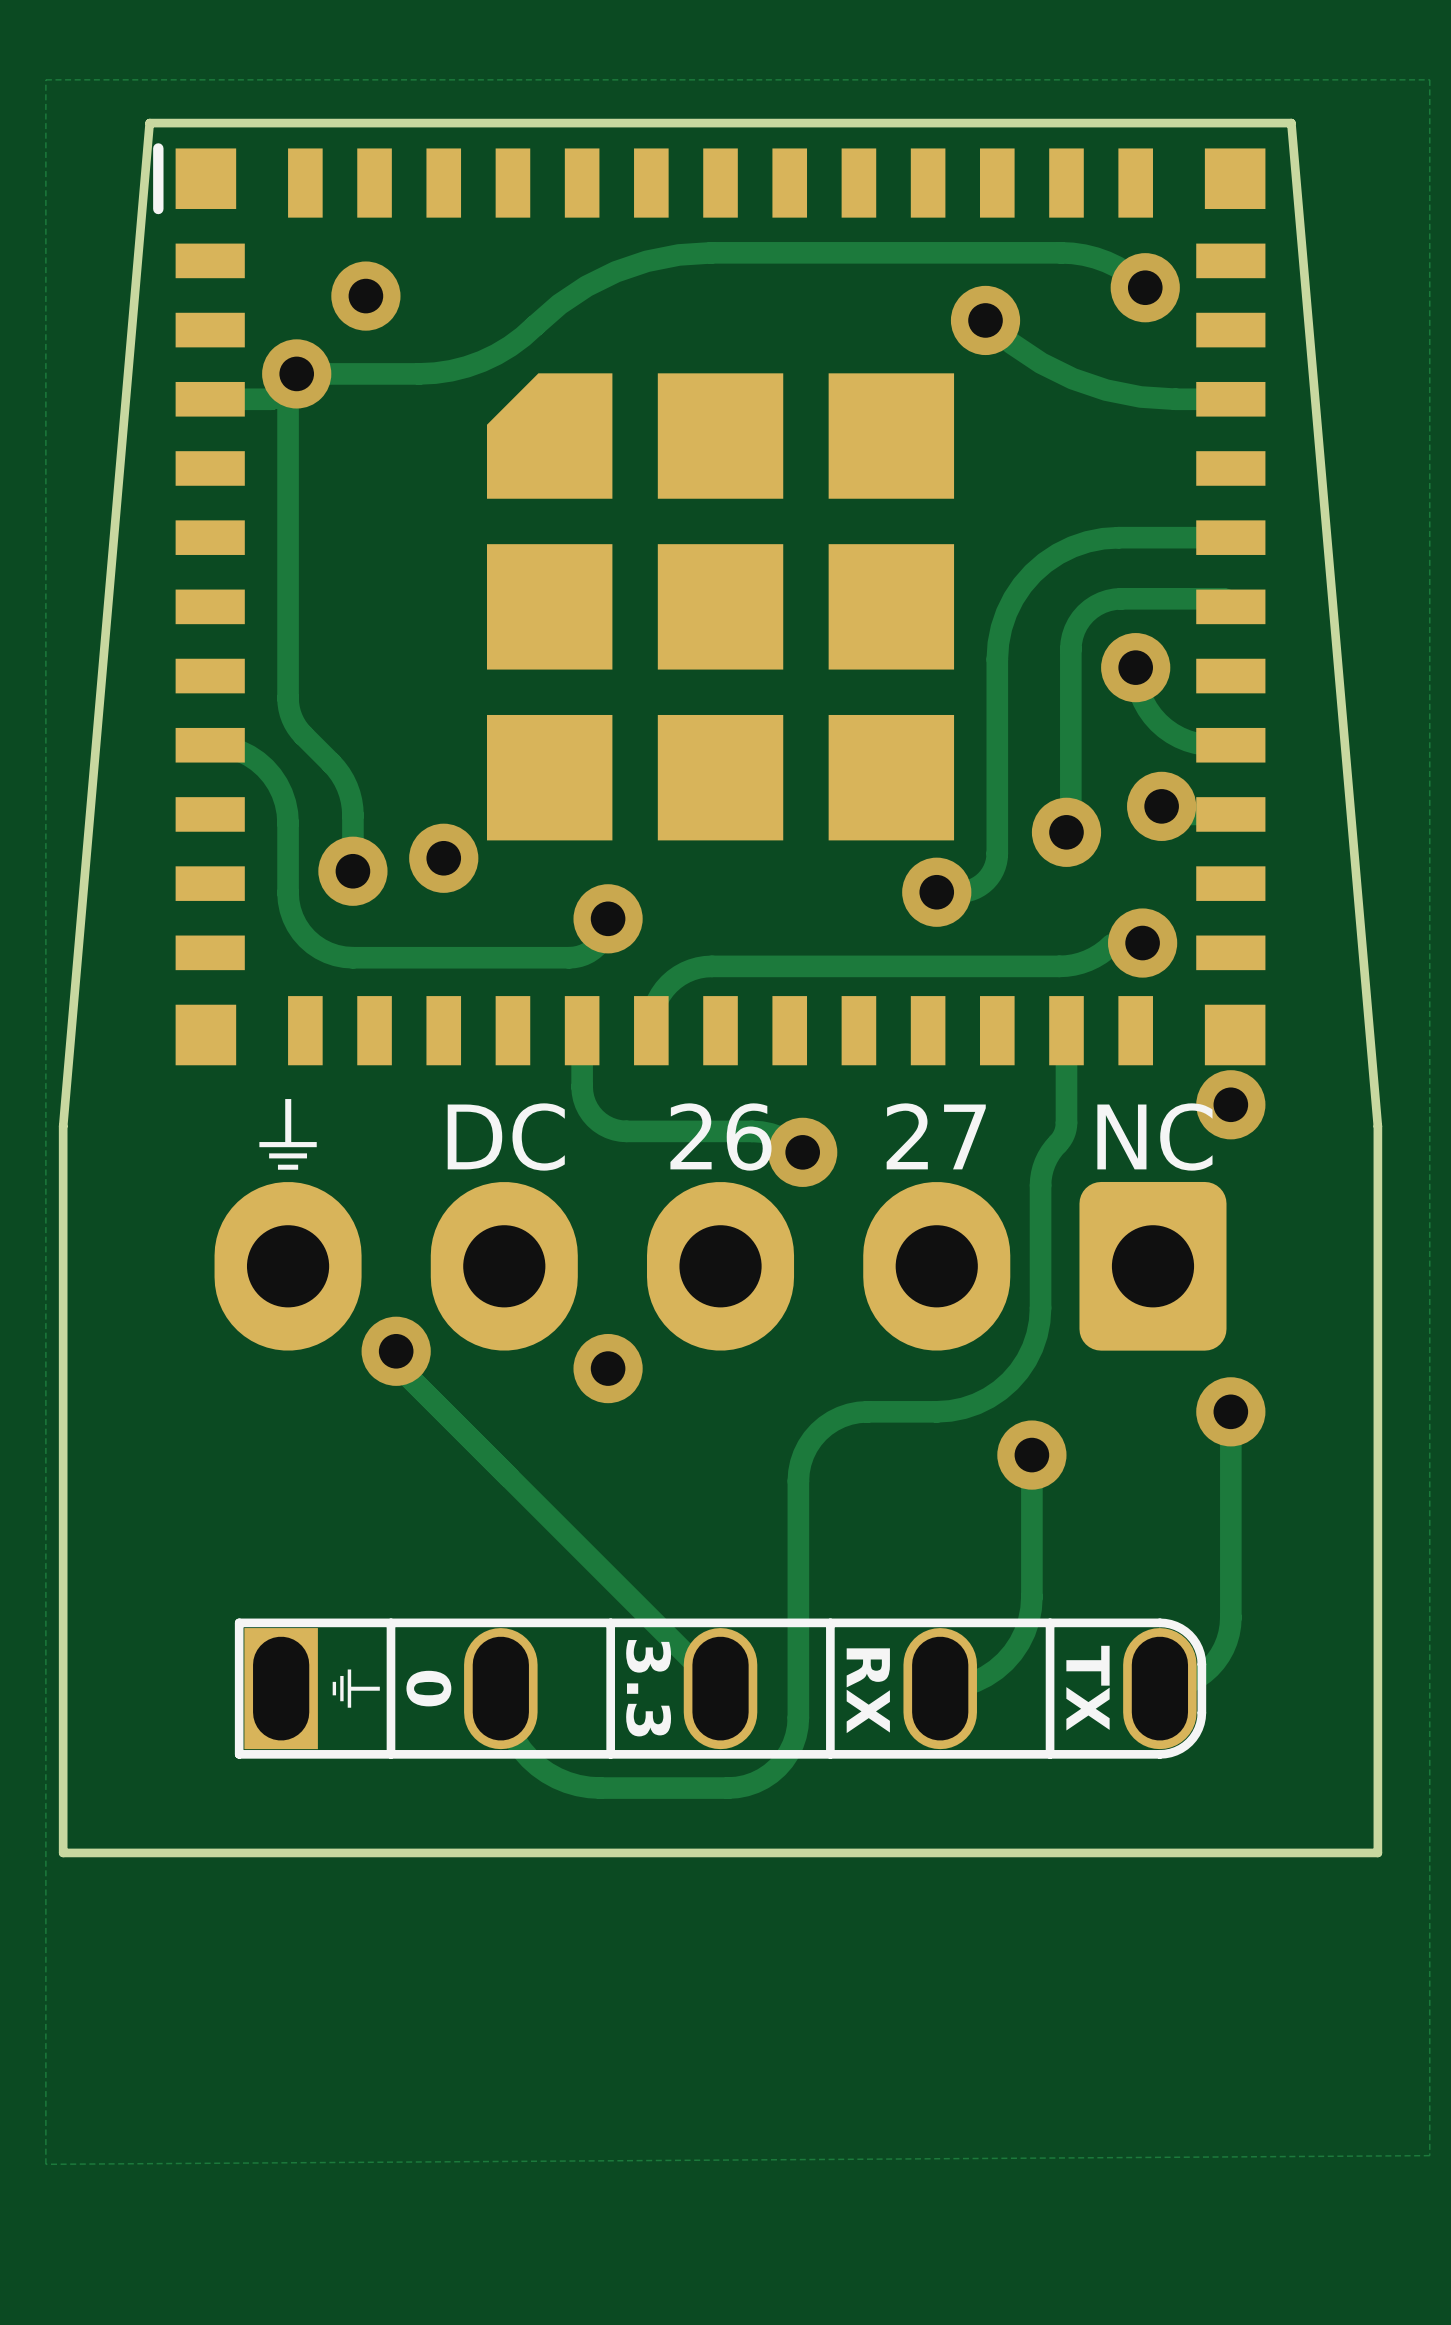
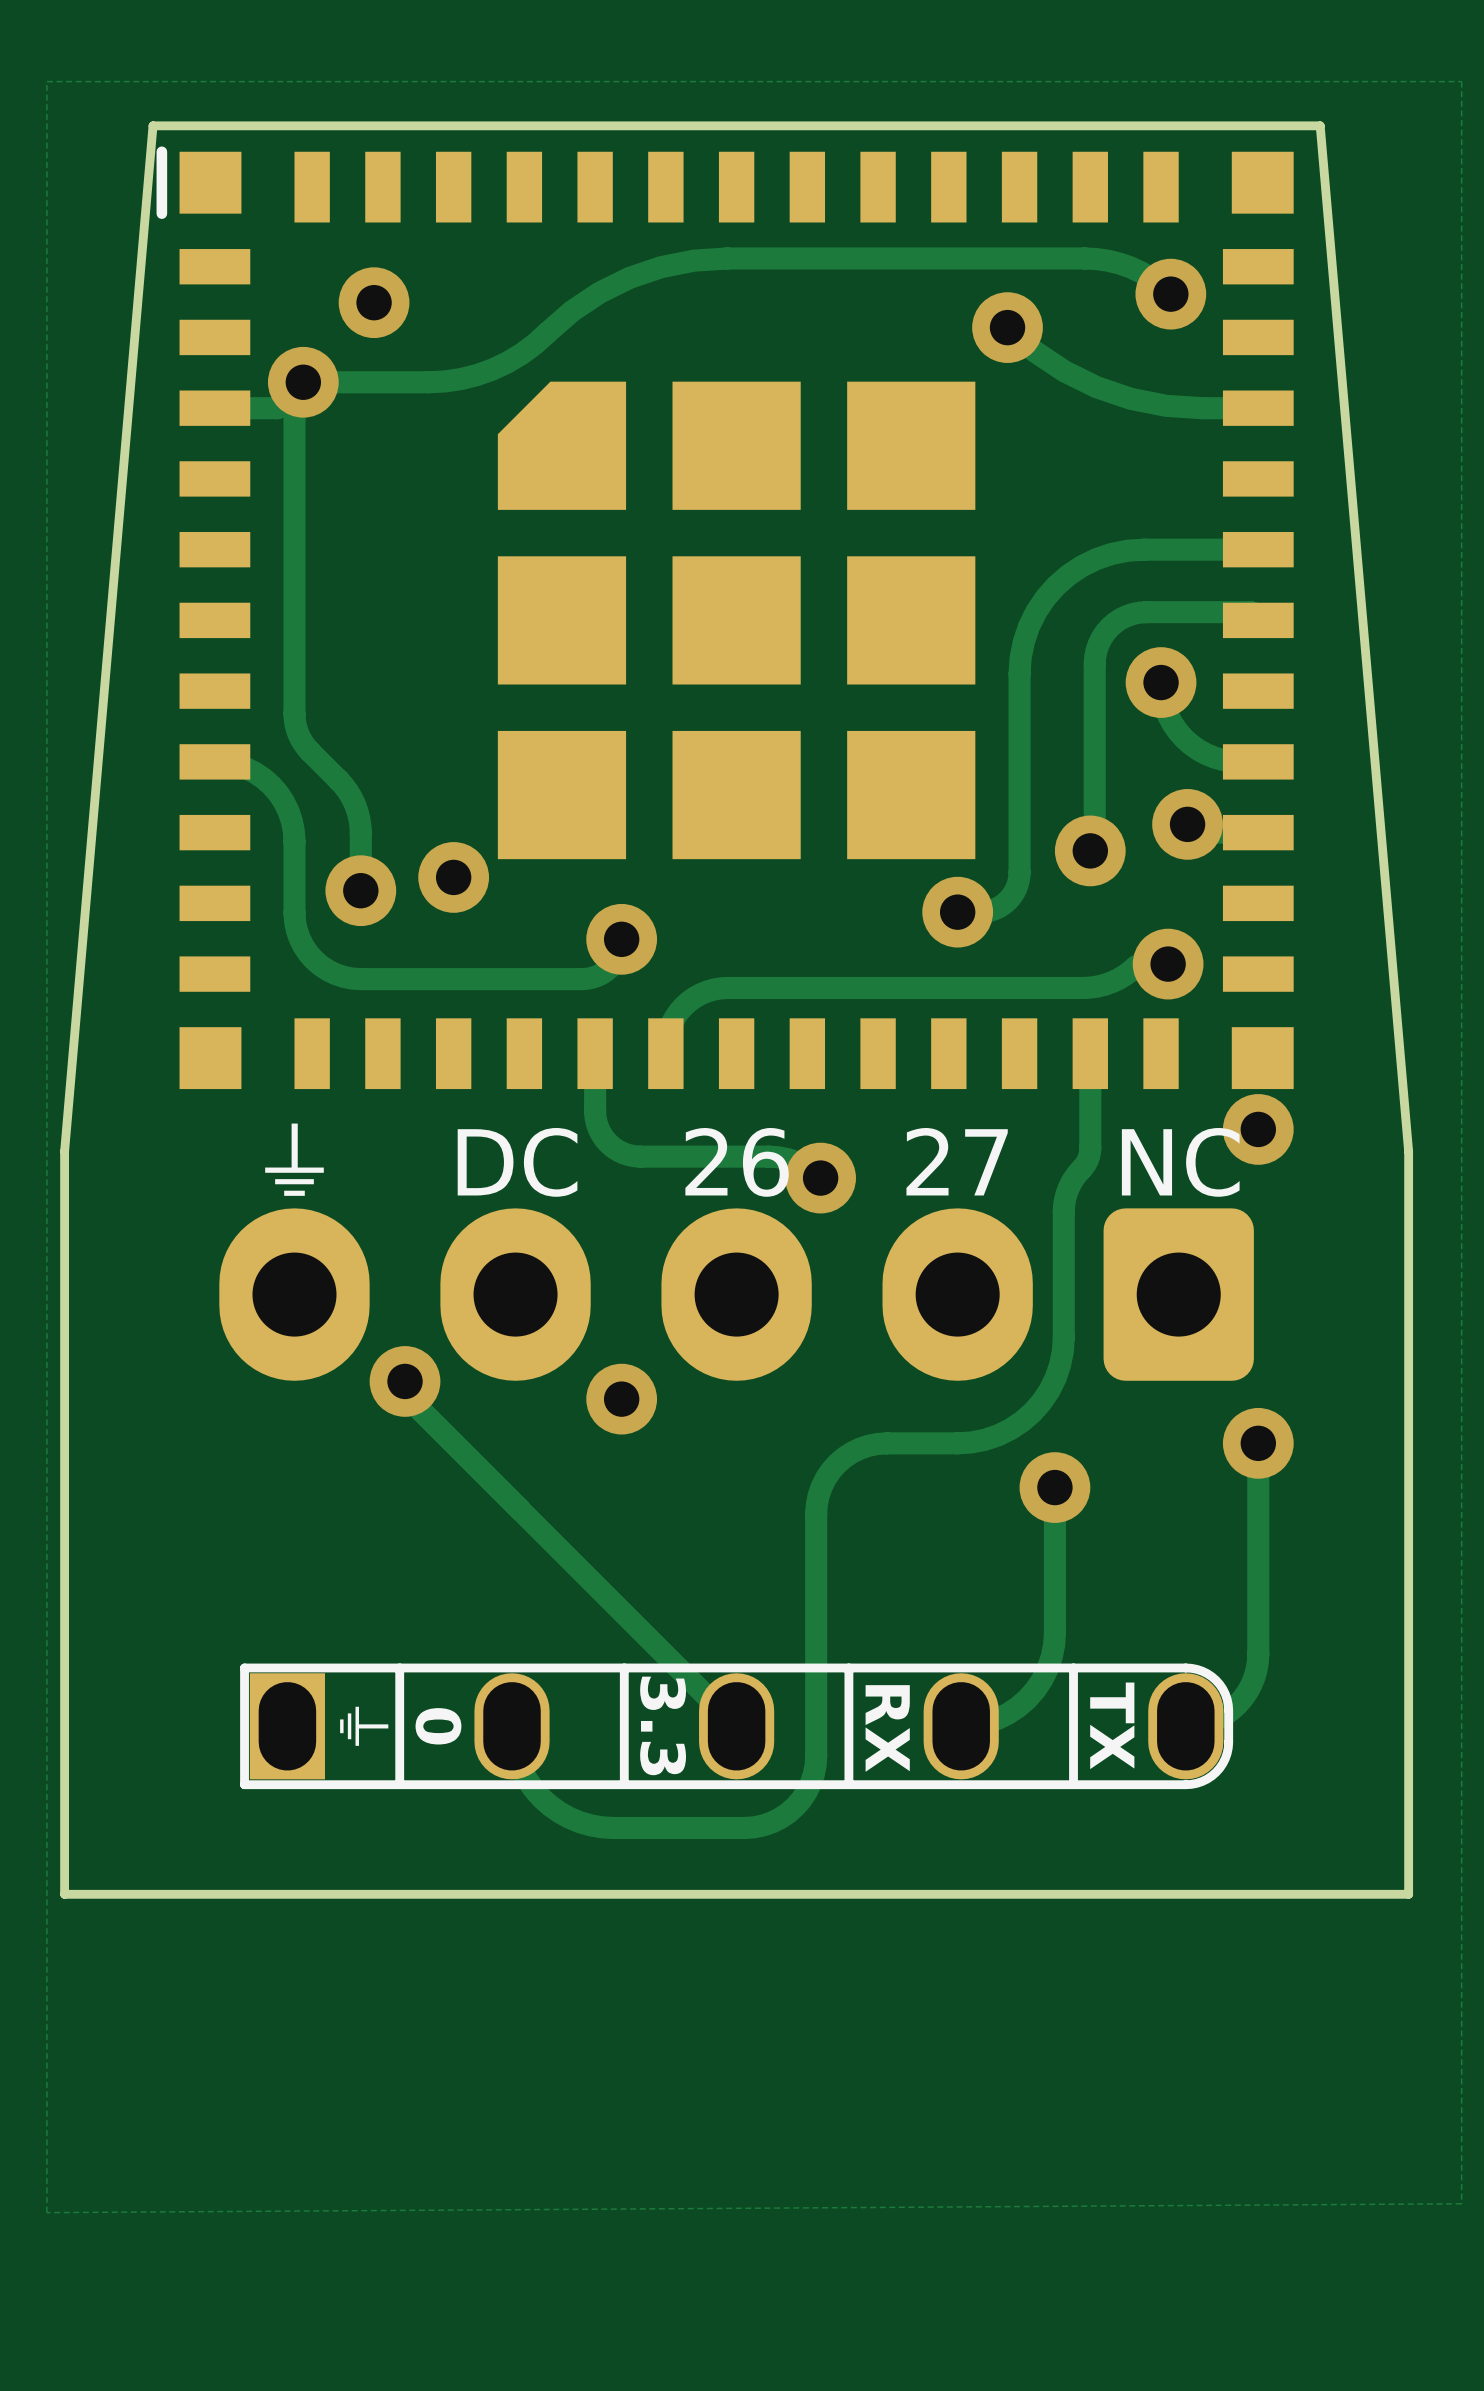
part footprint: [234, 1618, 1207, 1759] -> [240, 1663, 1234, 1790]

